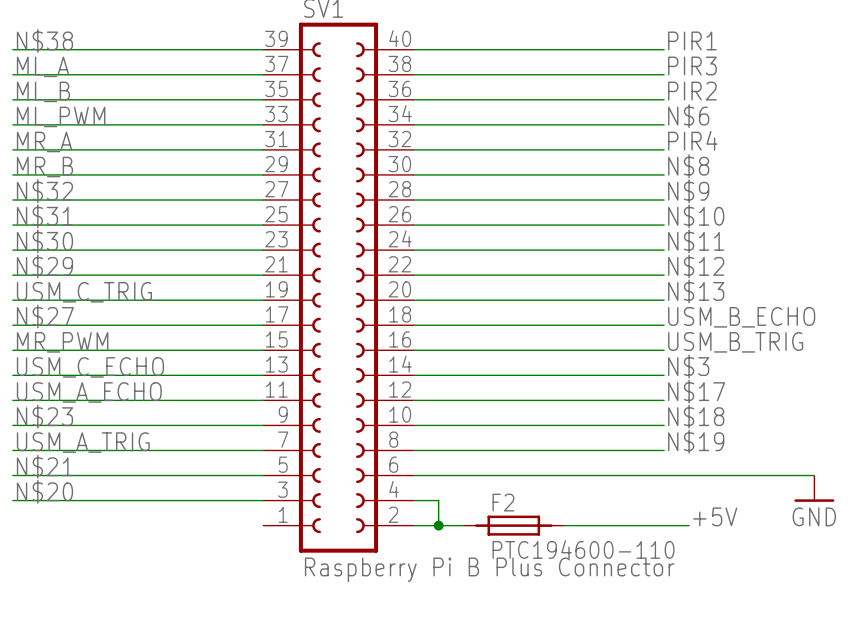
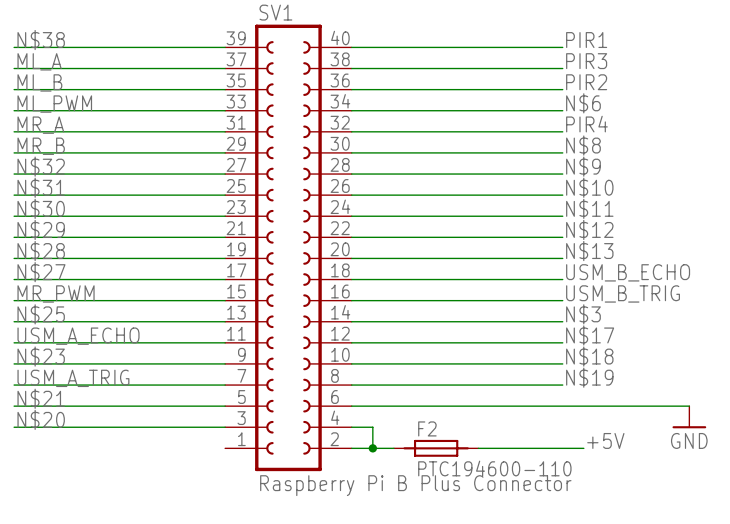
label: USM_C_TRIG (84, 292) -> N$28 (41, 251)
label: USM_C_ECHO (90, 367) -> N$25 (41, 314)

